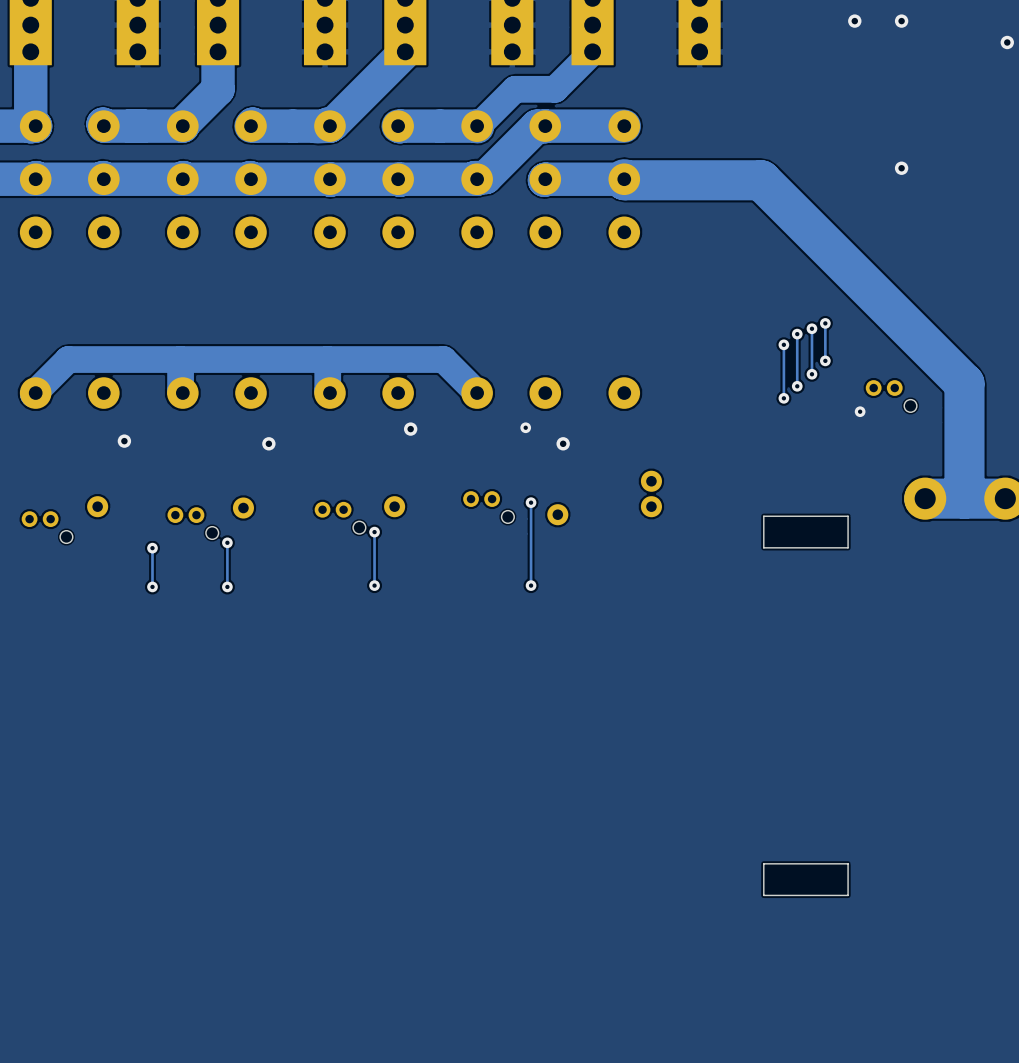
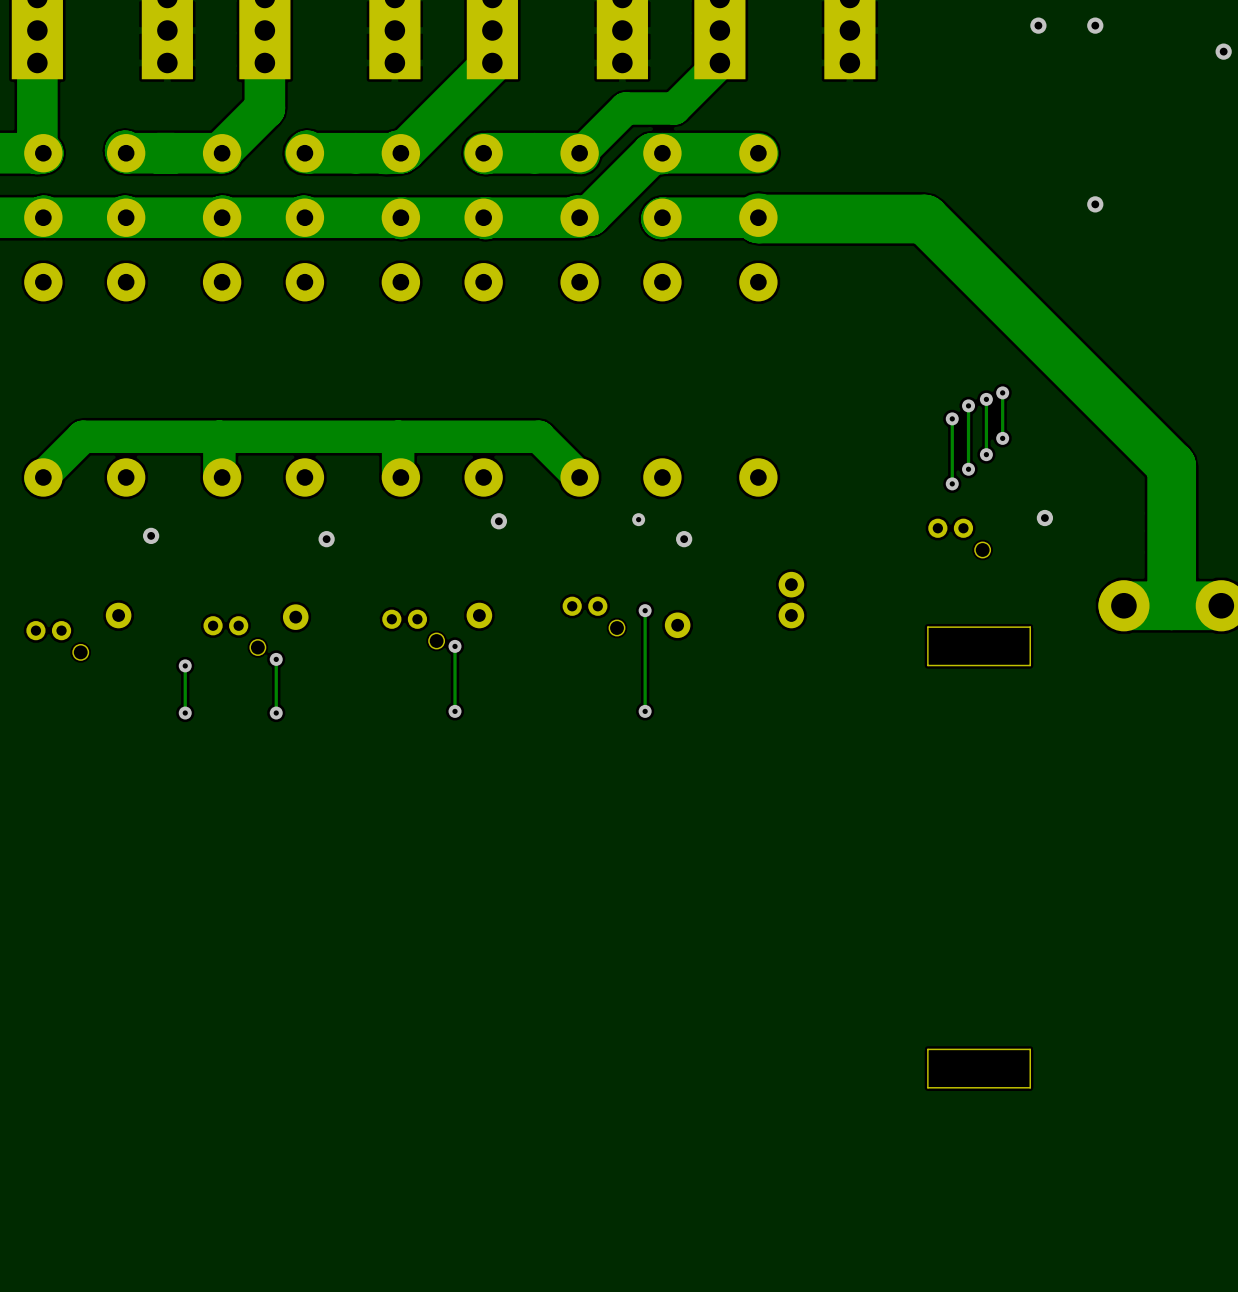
part position: (891, 396) -> (959, 538)
via: (860, 411) -> none
via: none -> (1044, 518)

